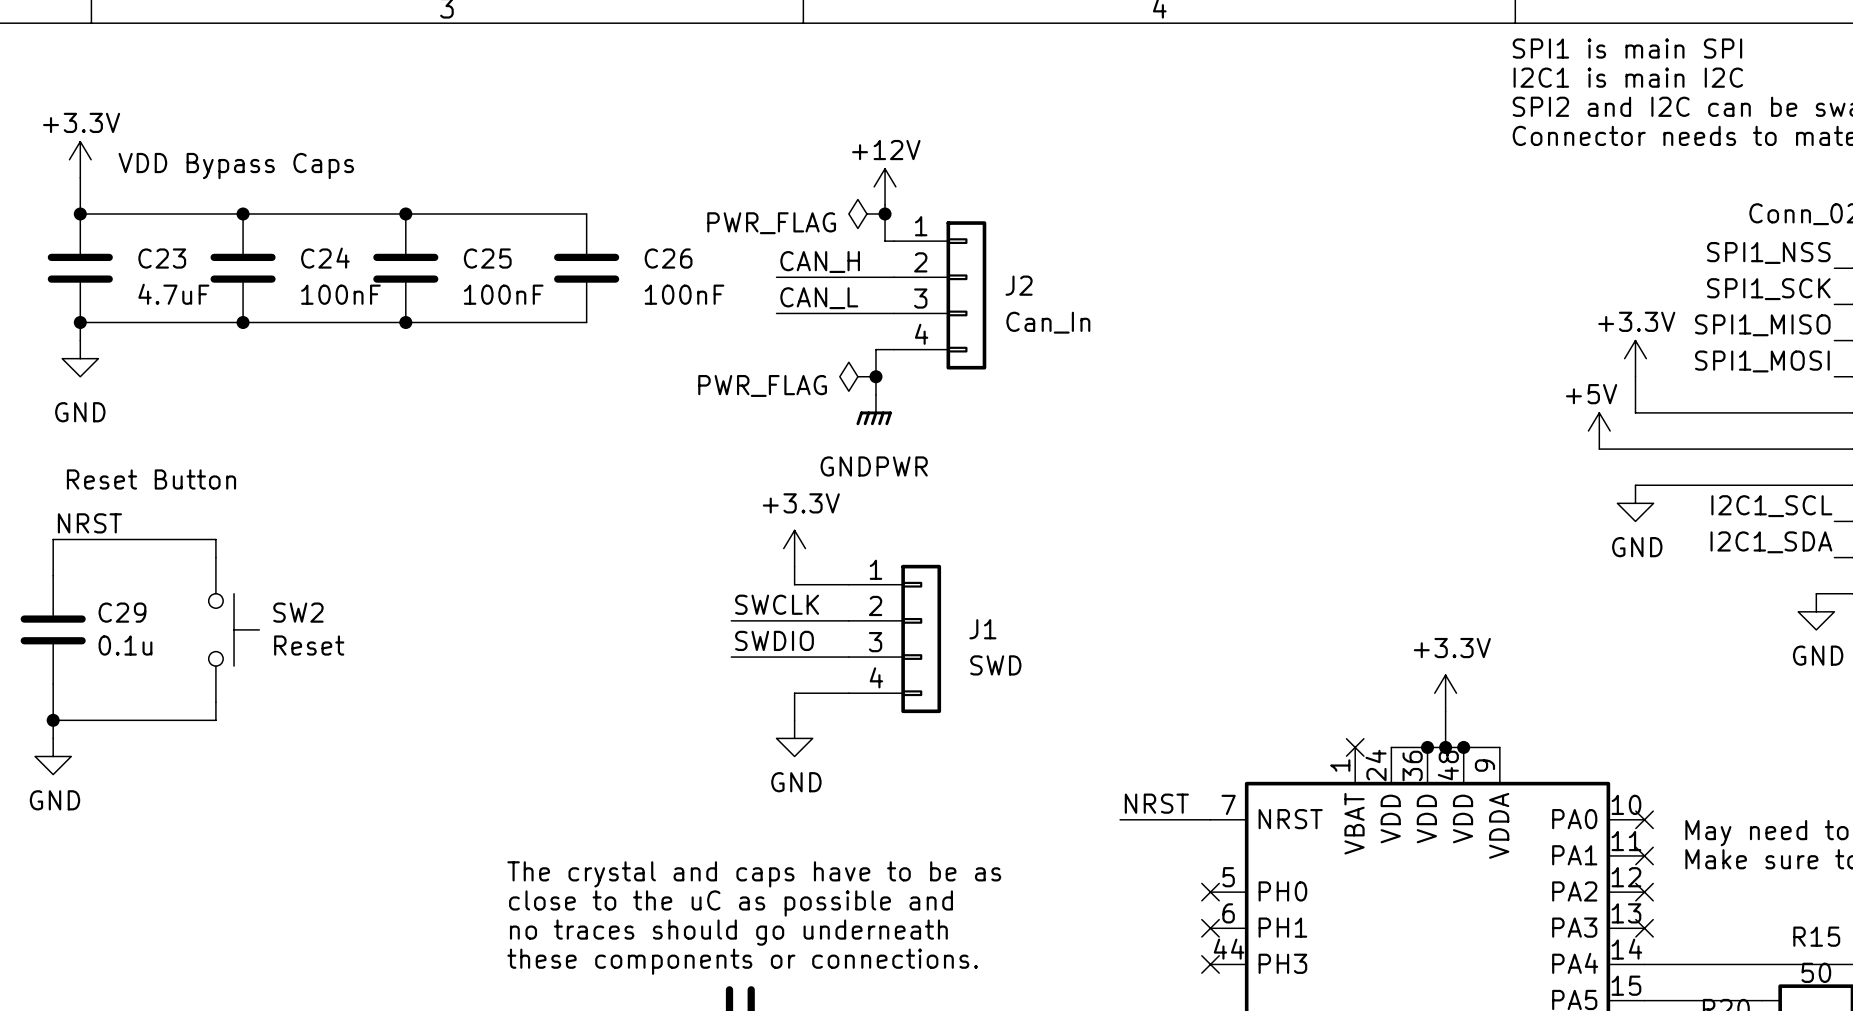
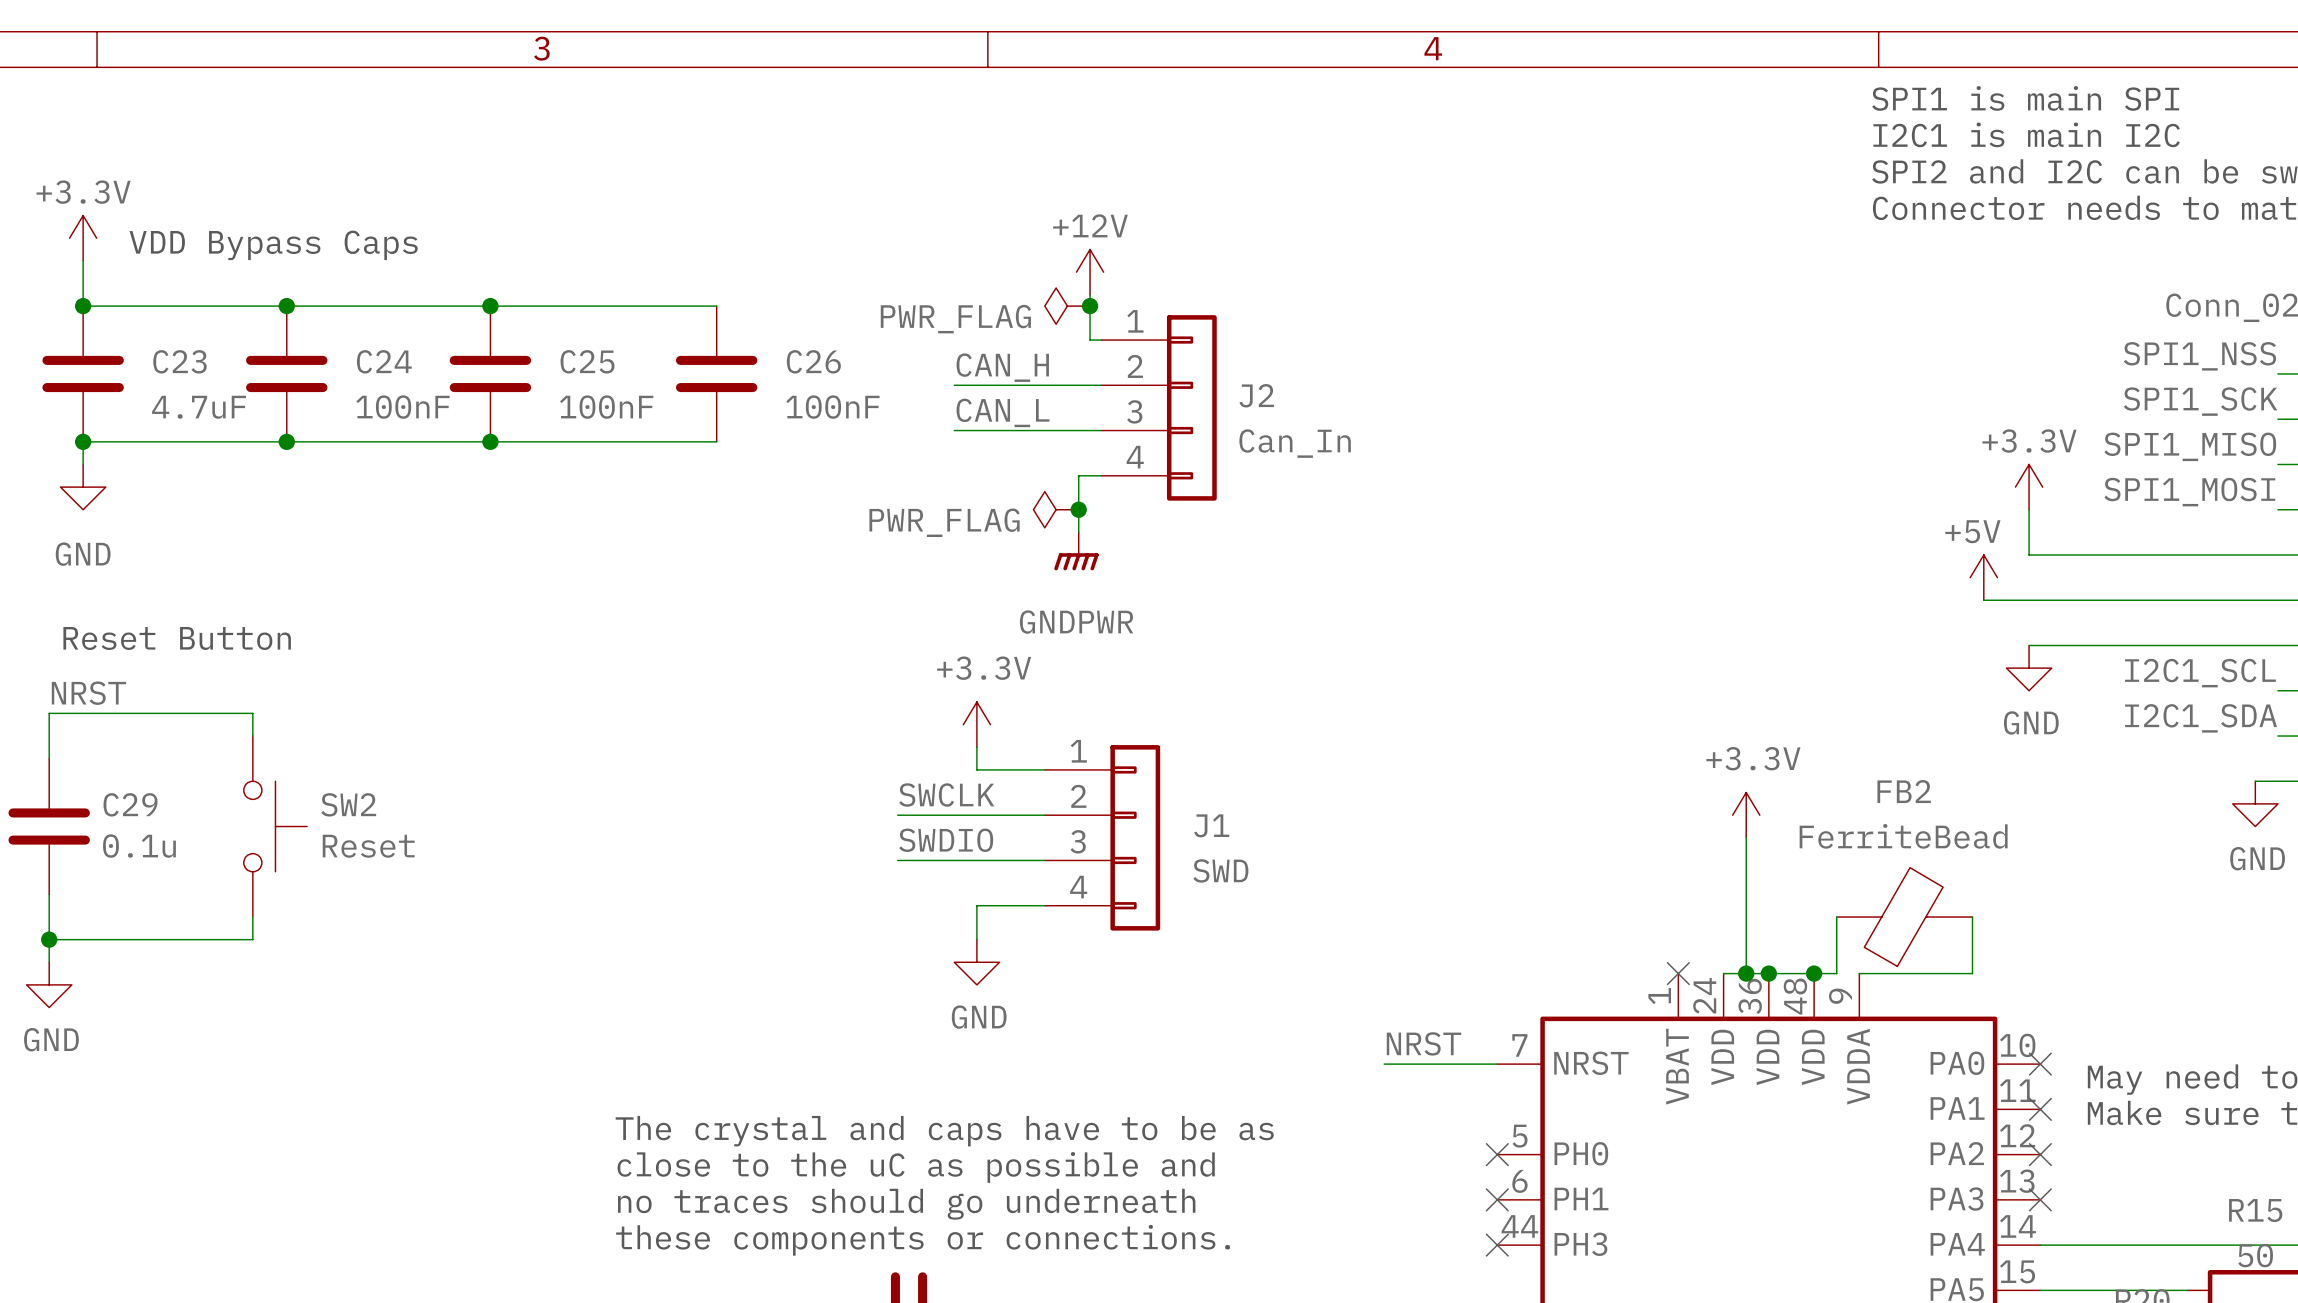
wire: none -> (1746, 837) (1746, 973)
power symbol position: +3.3V (1445, 693) -> +3.3V (1746, 815)
FB2: none -> FerriteBead (1904, 917)
wire: none -> (1972, 917) (1972, 973) (1859, 973)
wire: (1445, 711) (1445, 747) -> none
junction position: (1445, 747) -> (1746, 973)
wire: (1481, 747) (1499, 747) -> (1836, 973) (1836, 917)

